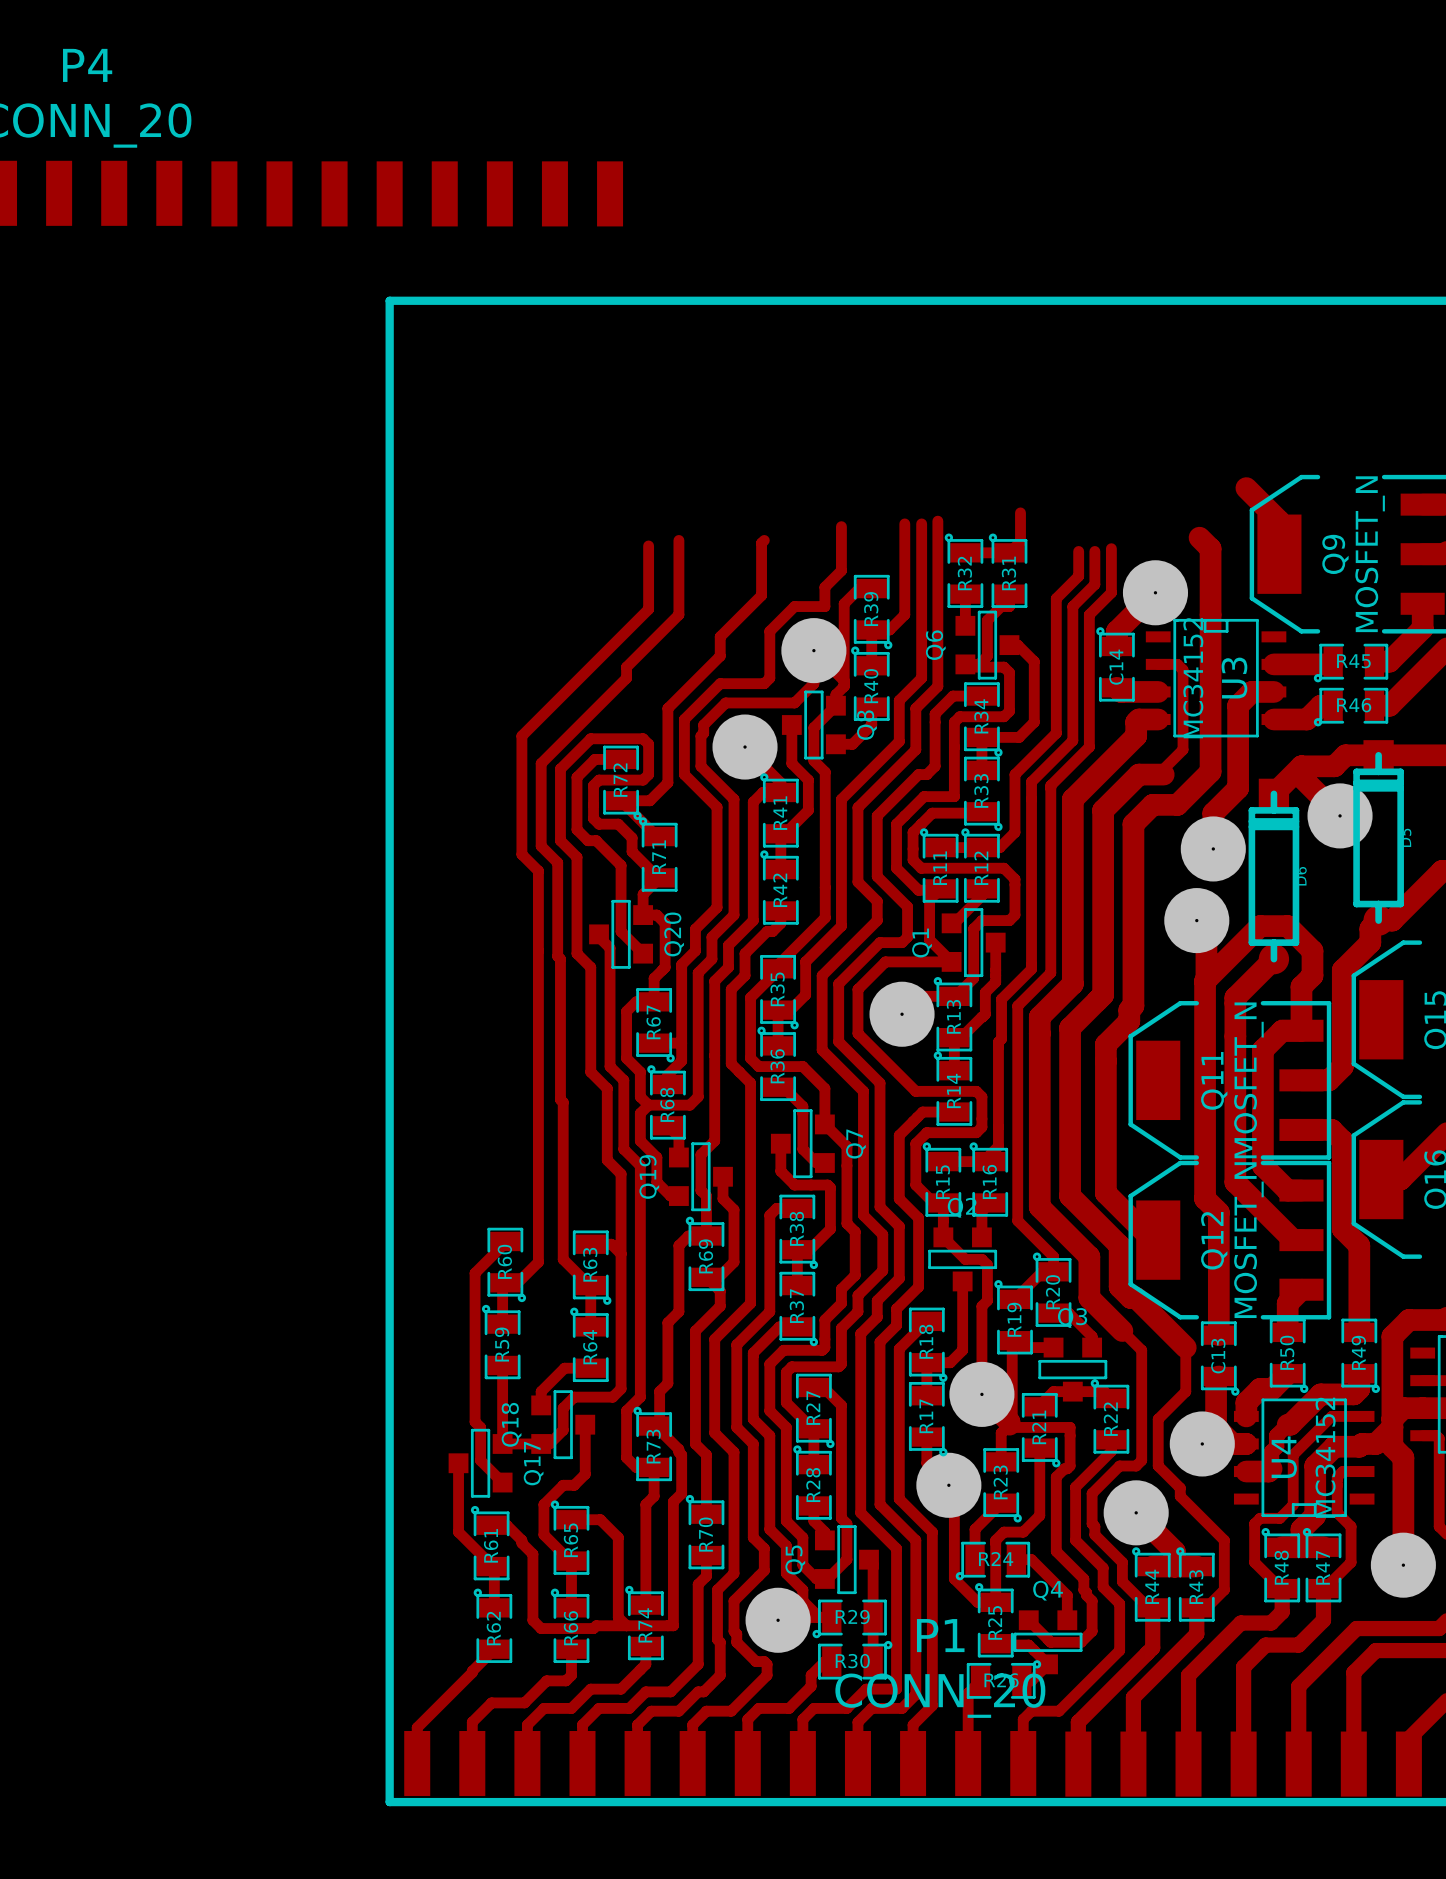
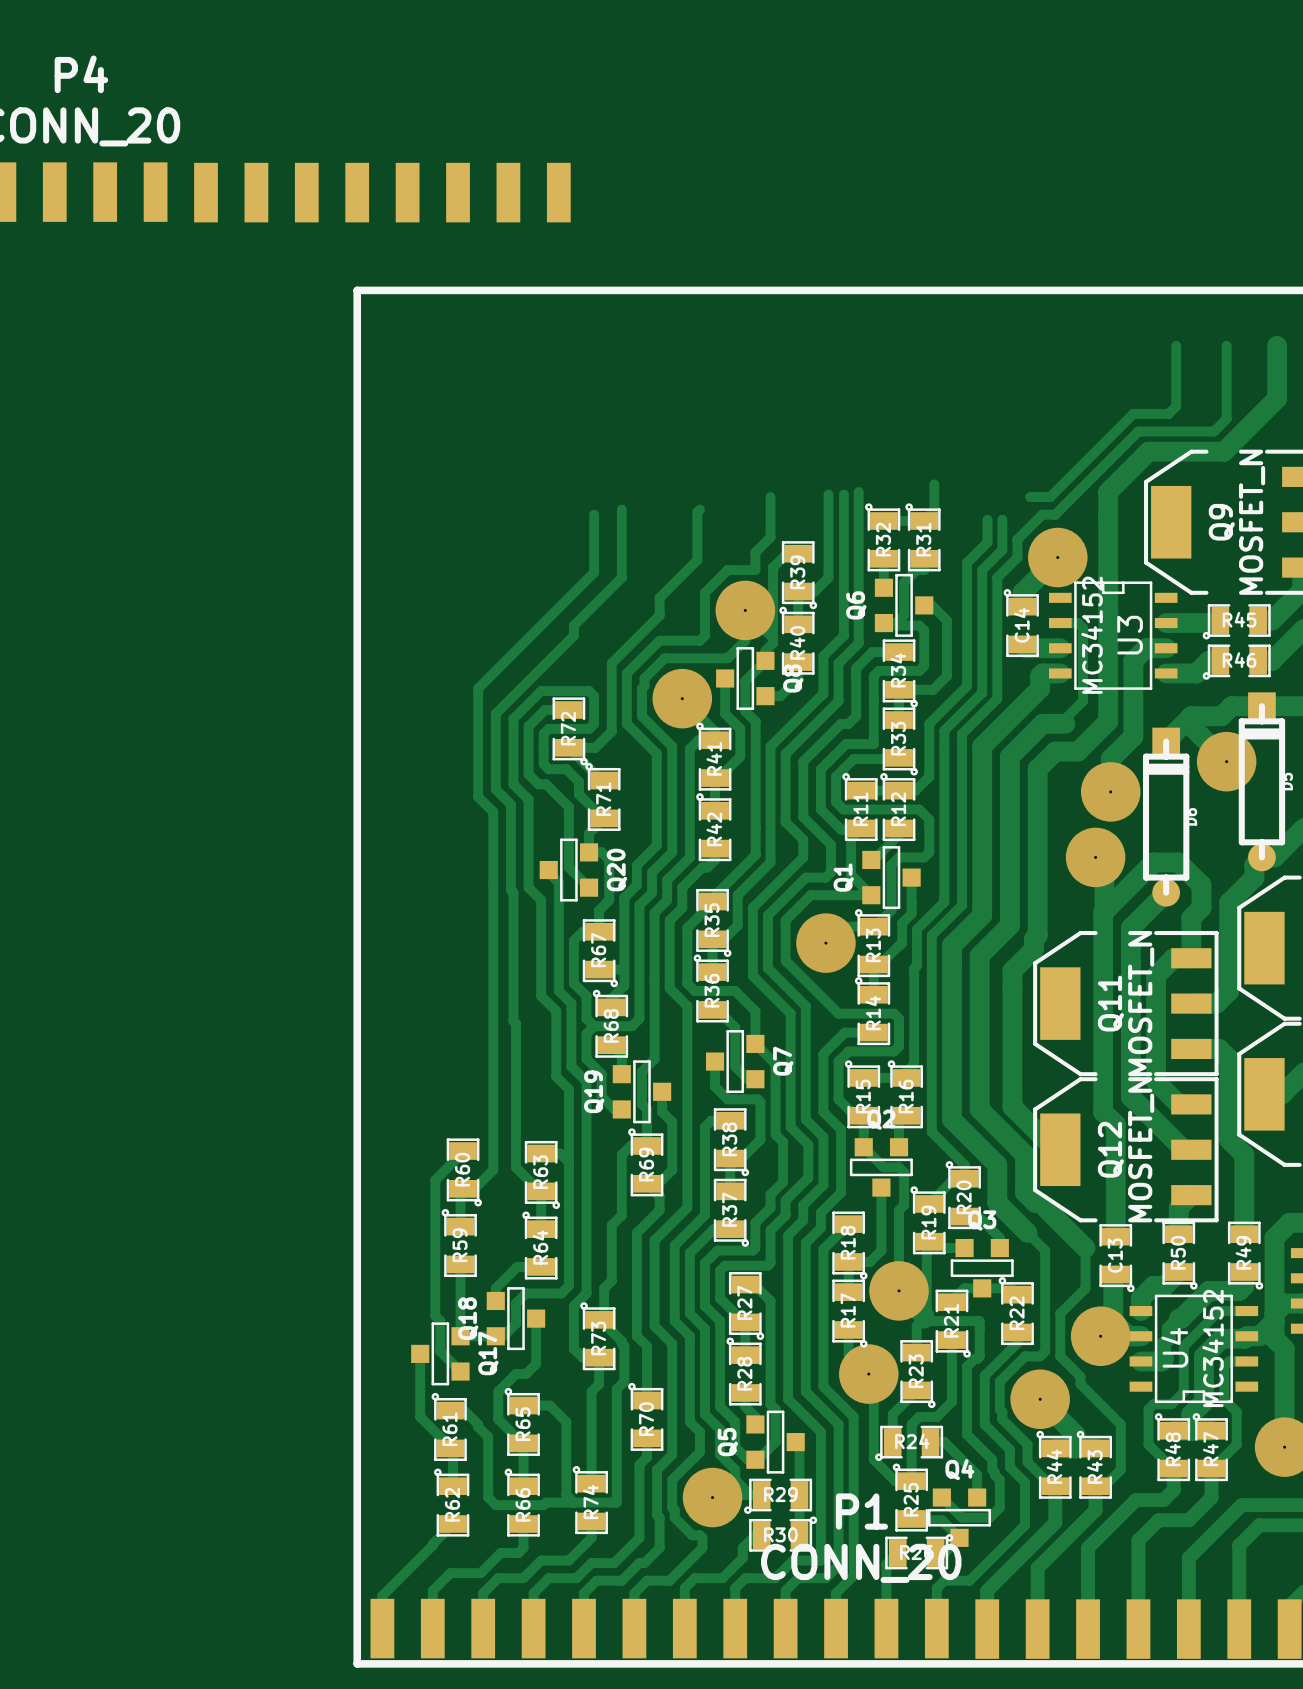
track: none -> (1176, 345) (1176, 406) (1168, 413) (1133, 413) (1050, 497) (1030, 497)
track: (1246, 488) (1279, 521) (1279, 554) -> none
track: (1199, 537) (1210, 548) -> (1277, 345) (1277, 398) (1224, 451) (1148, 451) (1108, 492) (1108, 517)
track: (1111, 548) (1111, 573) -> (1226, 345) (1226, 418) (1214, 431) (1138, 431) (1055, 514) (1042, 514) (1017, 539)

